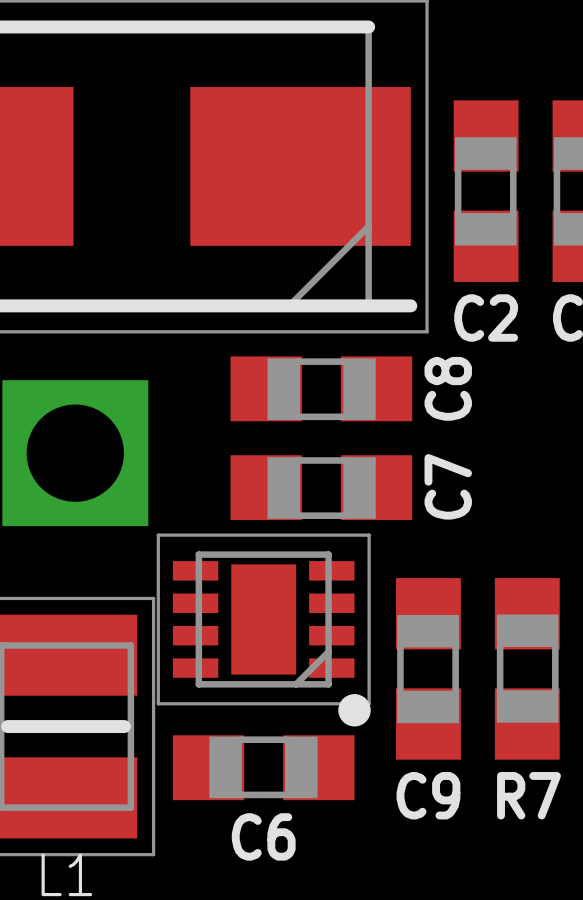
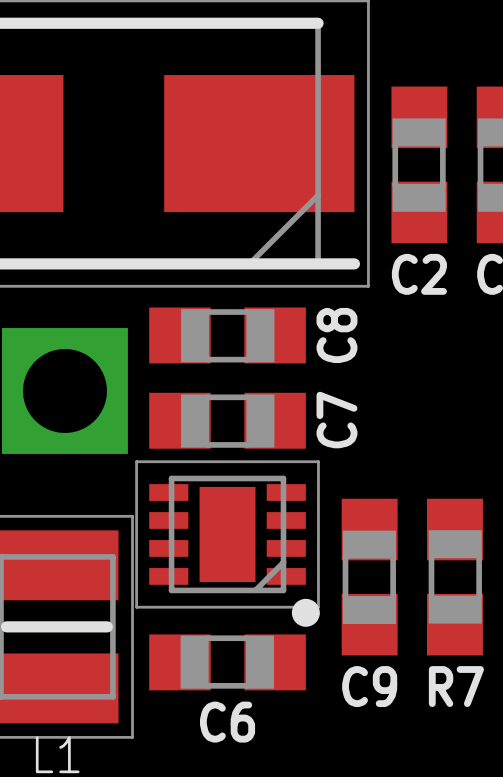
C8 position: (321, 388) -> (227, 335)
C7 position: (321, 487) -> (227, 420)

